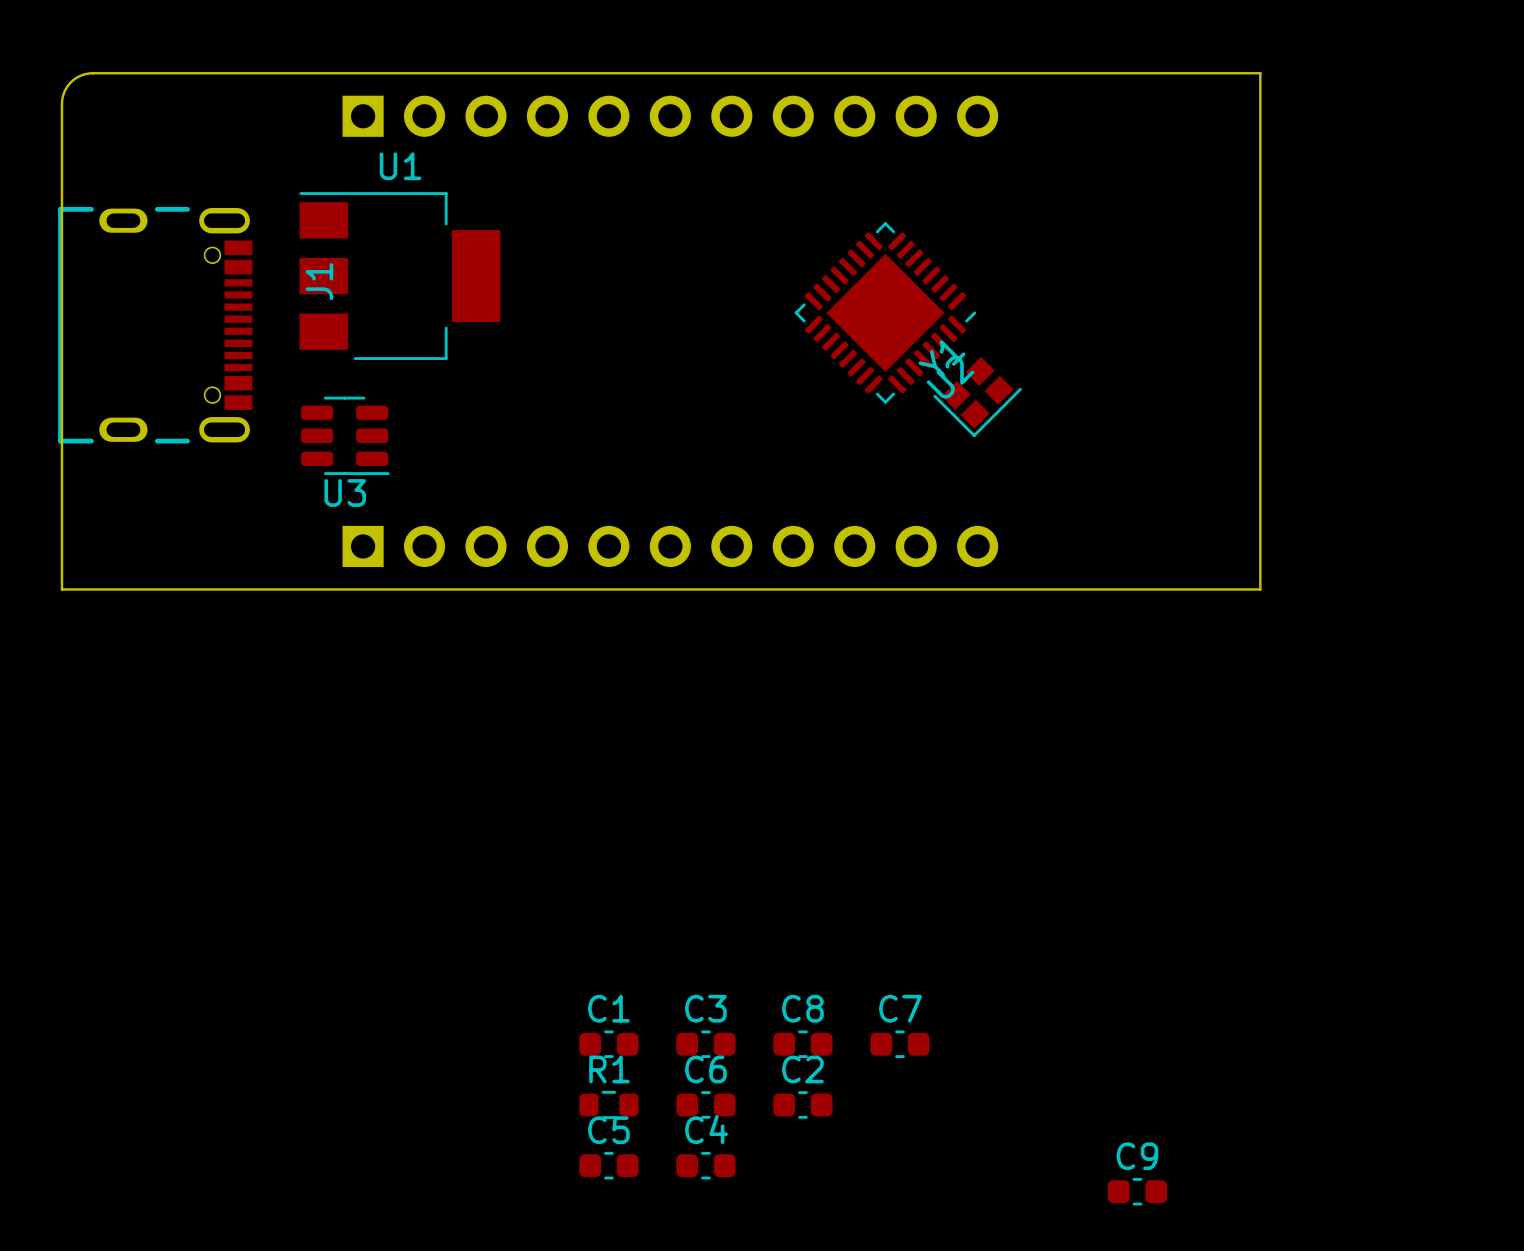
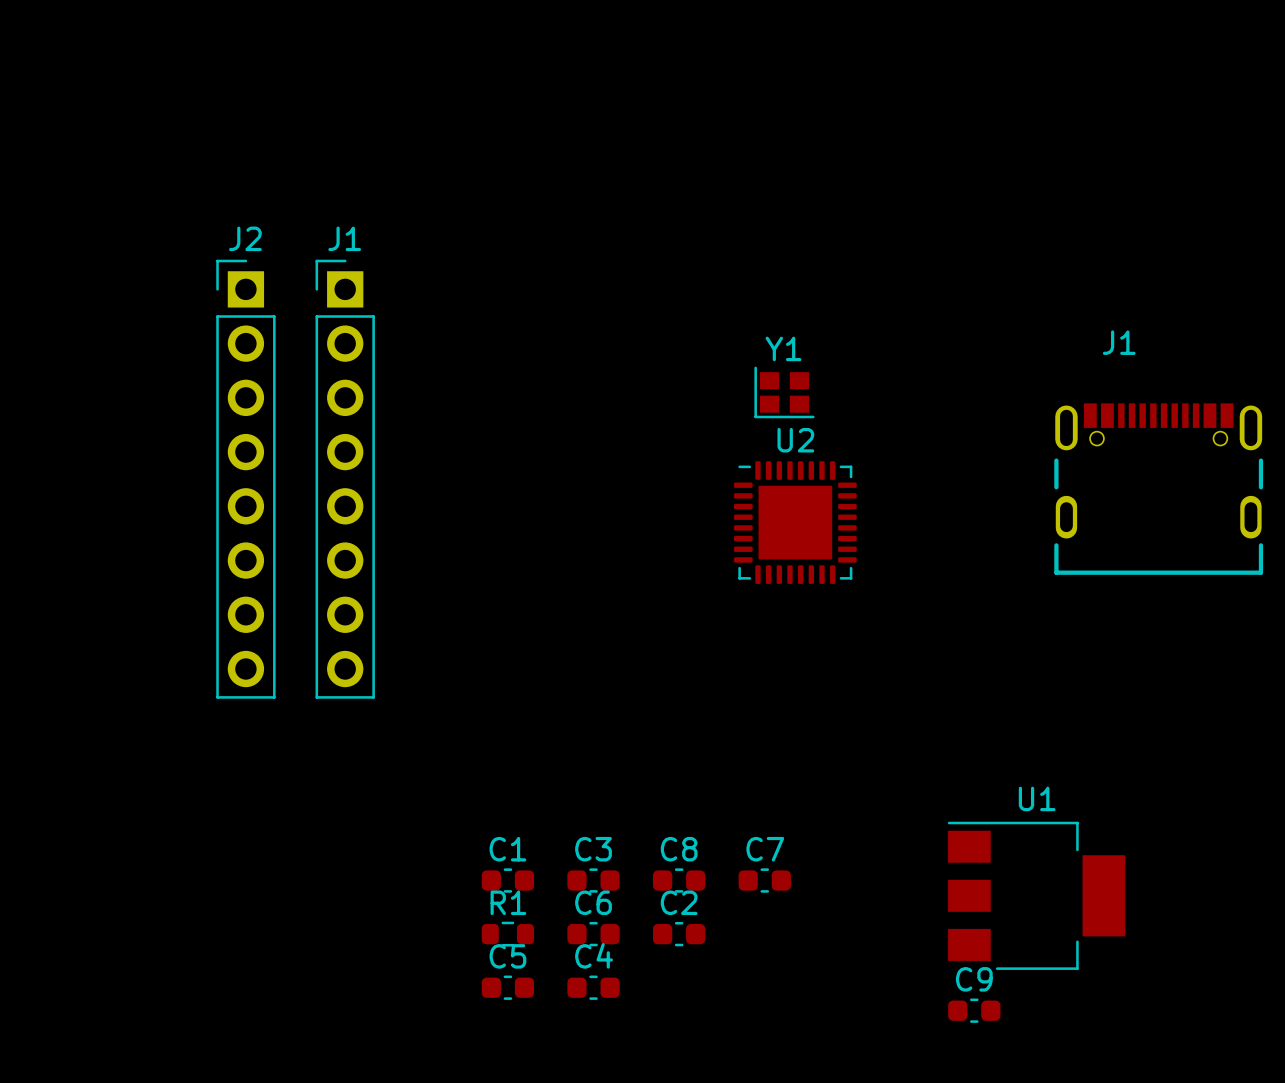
board edge: (92, 73) (1260, 73) (1260, 589) (61, 589) (62, 100) (65, 90) (70, 82) (79, 76) (92, 73) -> none
part: (670, 116) -> none
U1 position: (399, 276) -> (1036, 895)
U2 rotation: 0° (885, 312) -> 135° counterclockwise (795, 522)
U2 position: (885, 312) -> (795, 522)
J1: (155, 325) -> none
Y1 rotation: 0° (977, 396) -> 45° clockwise (784, 392)
Y1 position: (977, 396) -> (784, 392)
U3: (345, 435) -> none
part: (670, 546) -> none
J2: none -> (245, 479)
J1: none -> (345, 479)
J1: none -> (1158, 489)

